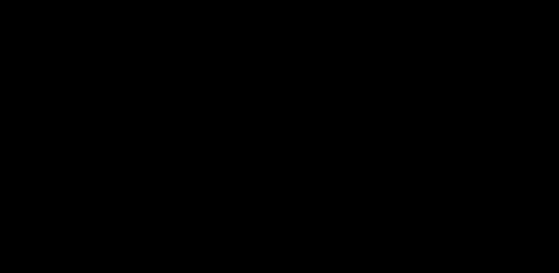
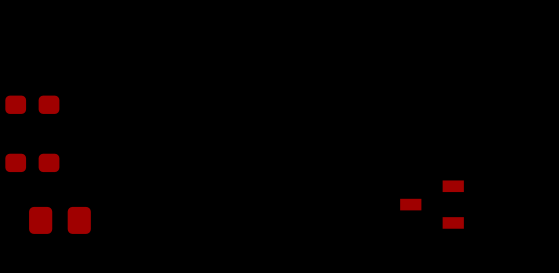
part: none -> (32, 104)
part: none -> (32, 162)
part: none -> (432, 204)
part: none -> (59, 220)

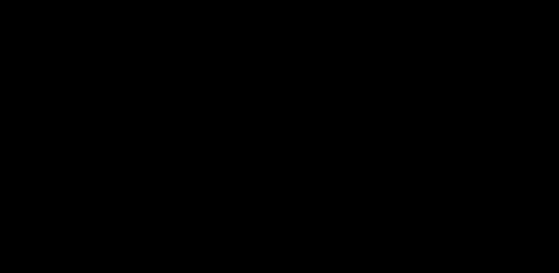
part: (32, 104) -> none
part: (32, 162) -> none
part: (432, 204) -> none
part: (59, 220) -> none

